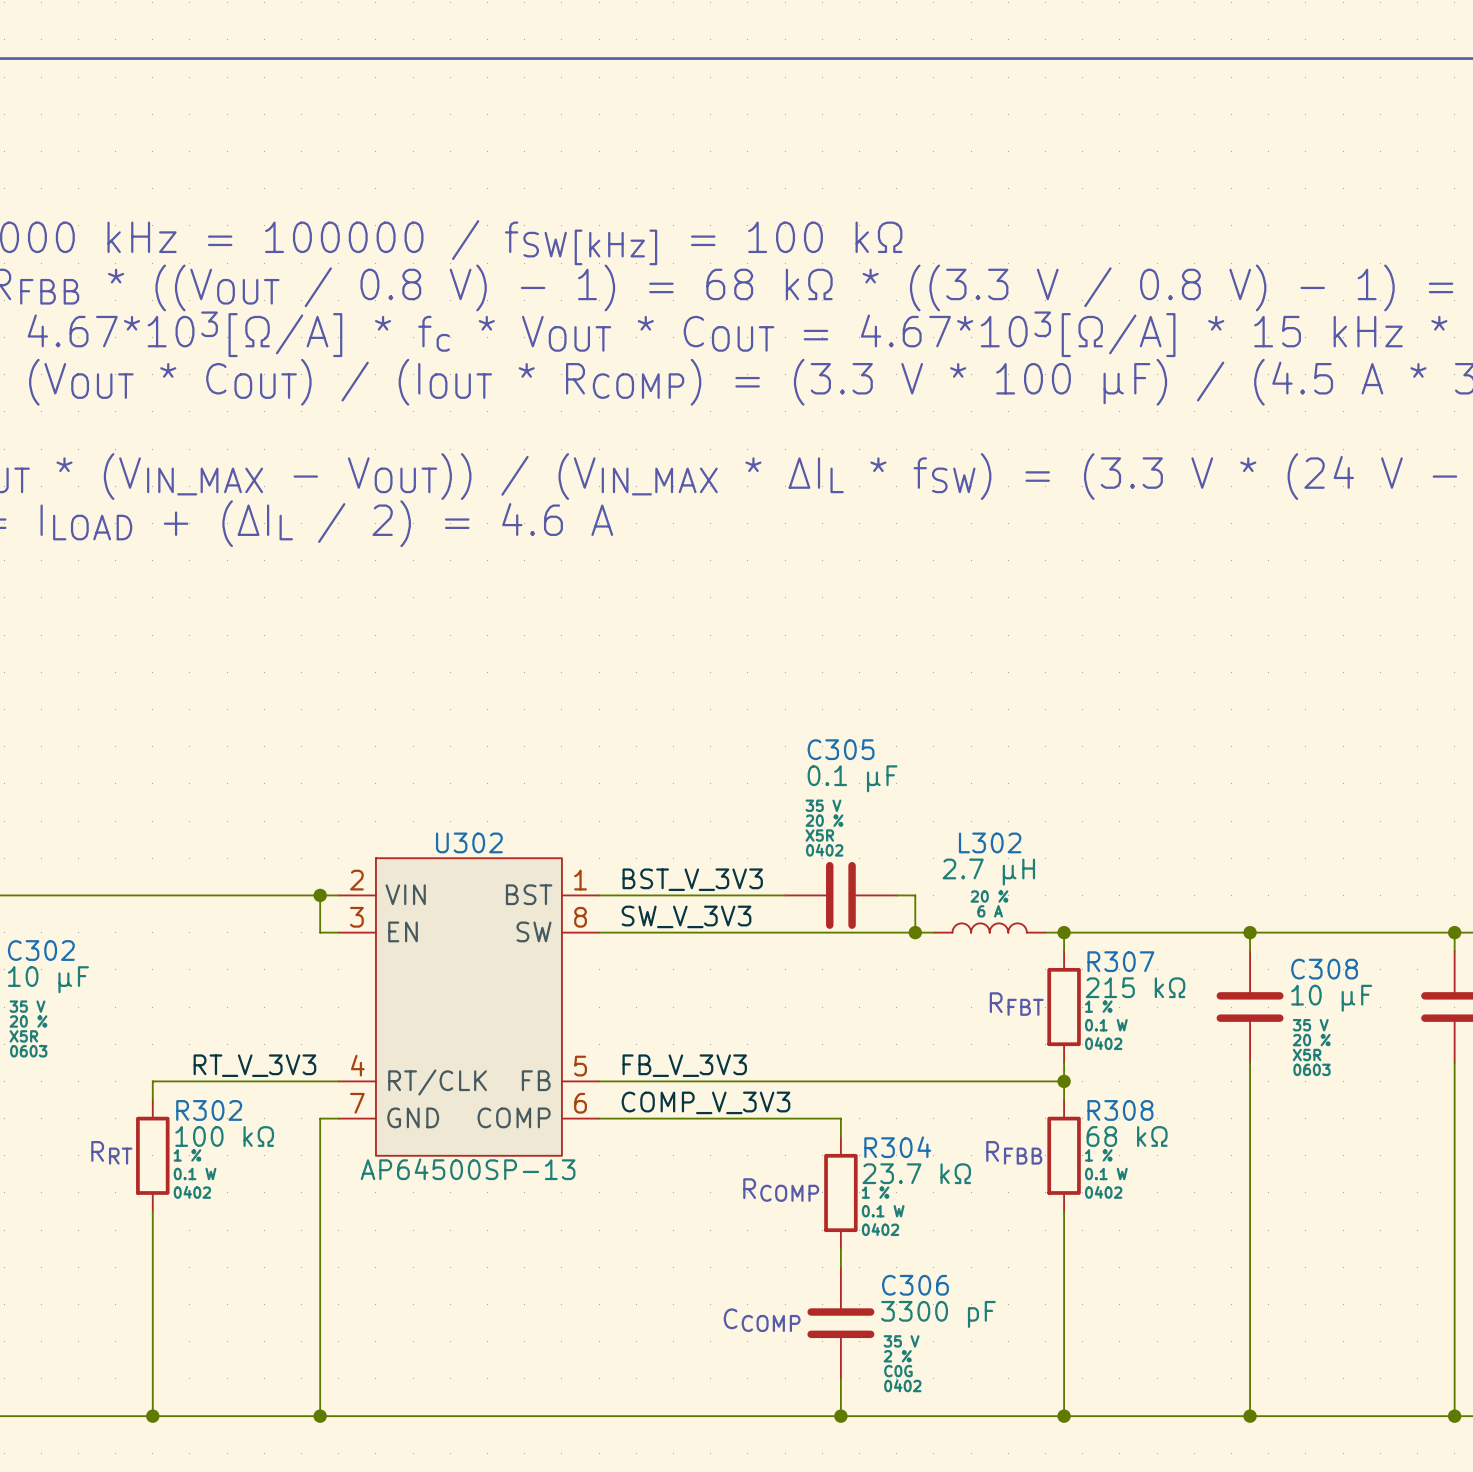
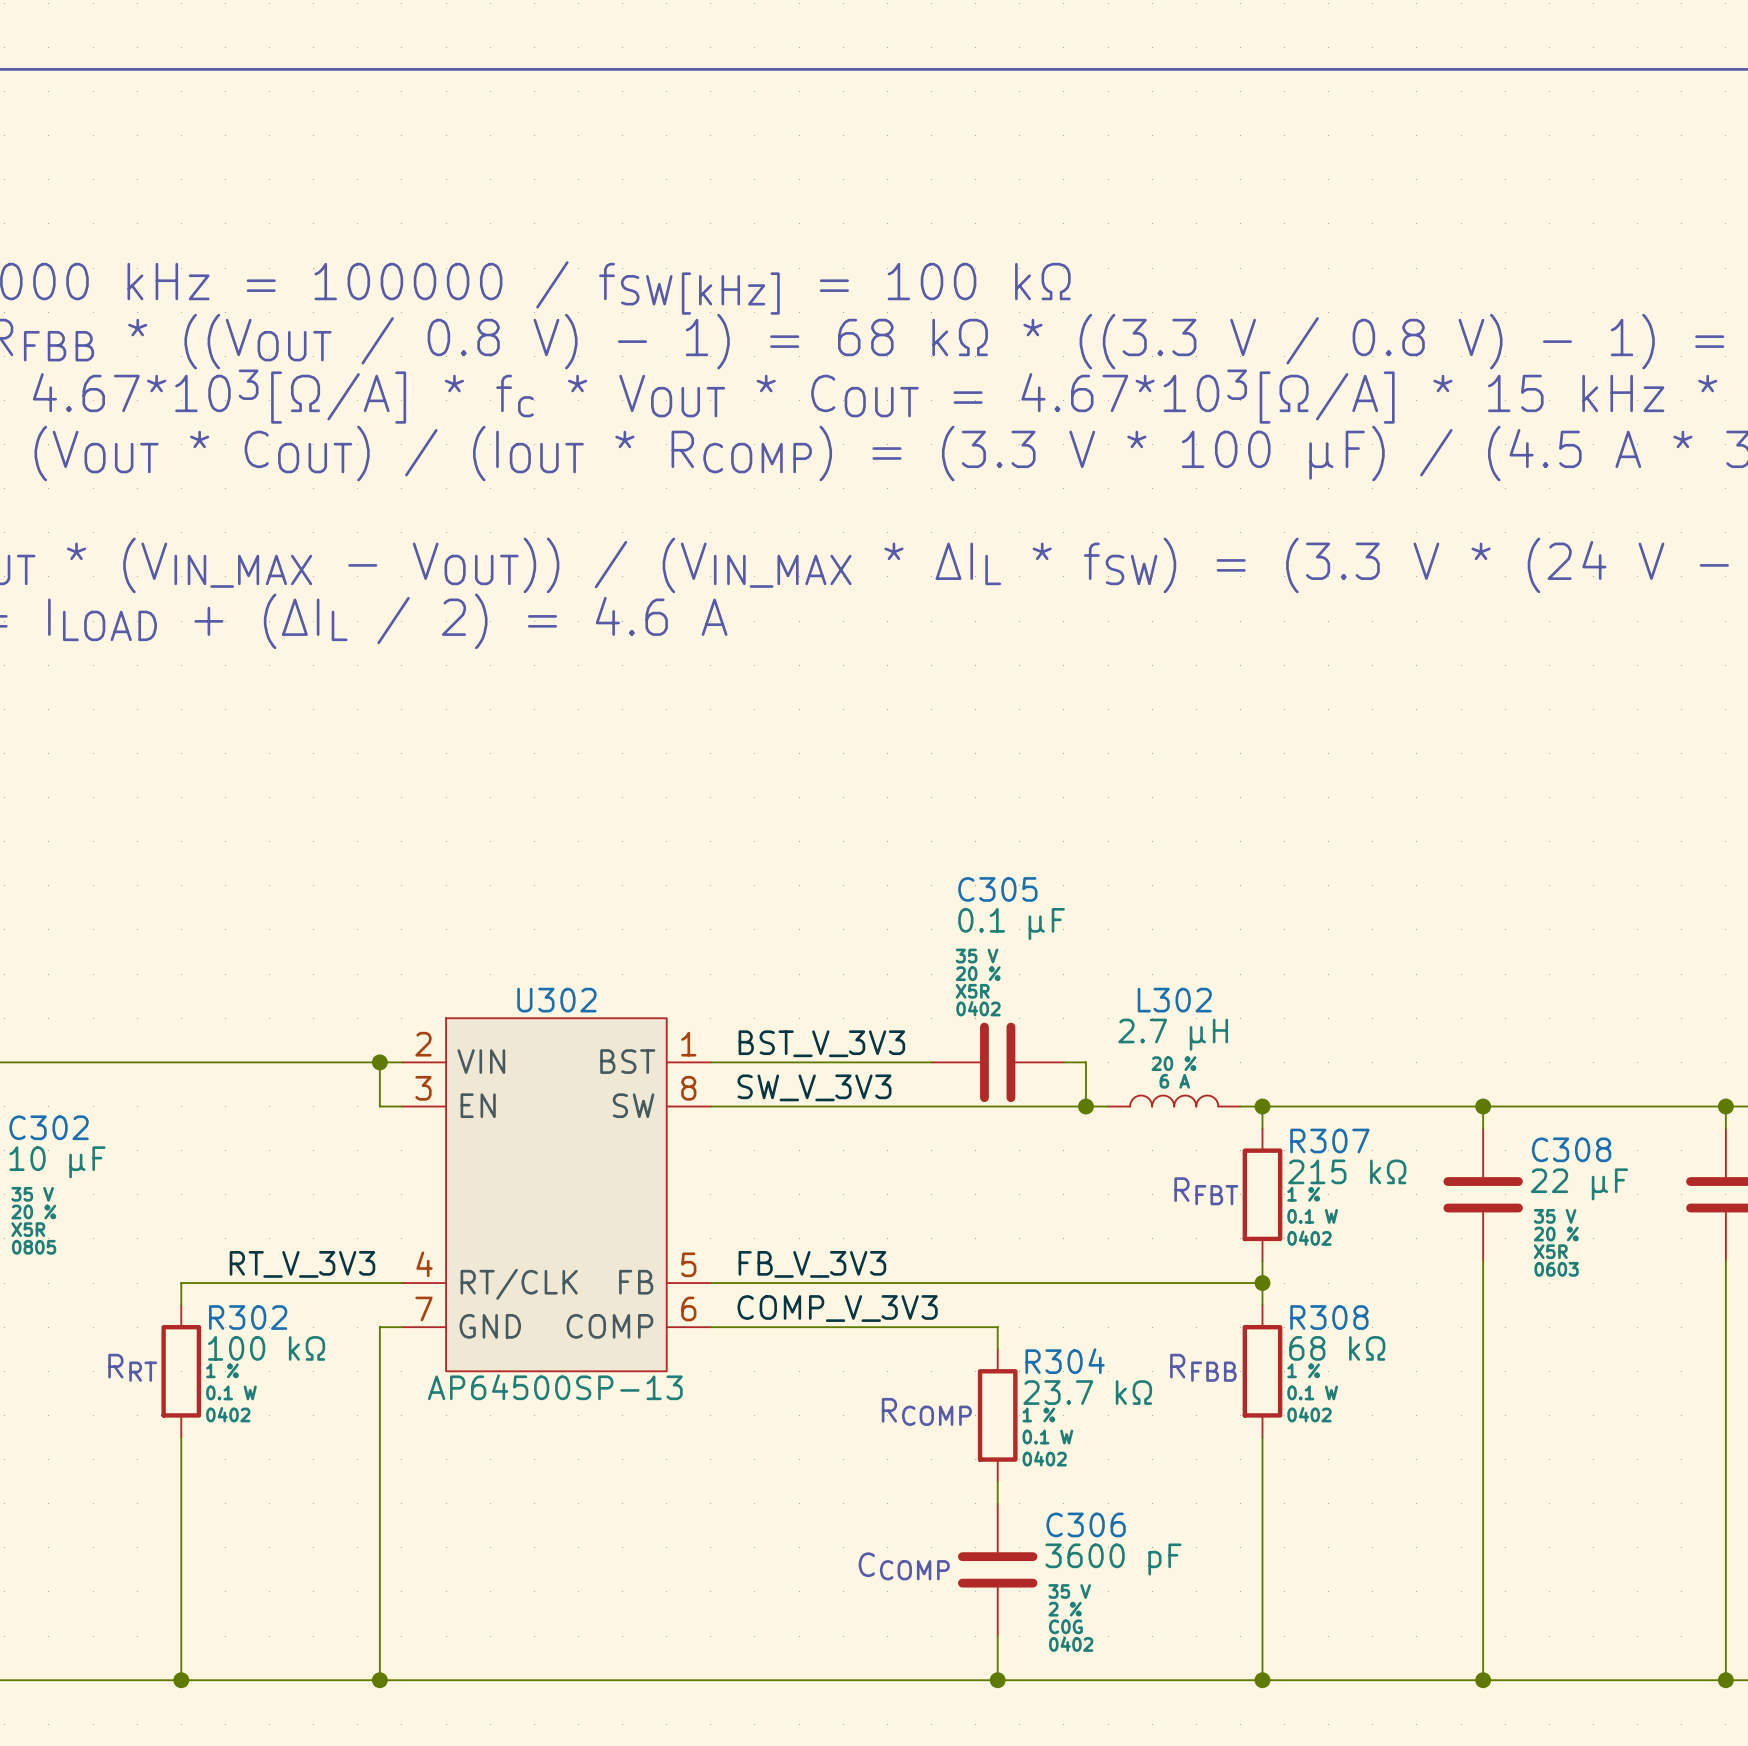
C308 value: 10 µF (1331, 998) -> 22 µF (1579, 1184)
C302 text: 0603 (28, 1051) -> 0805 (34, 1247)
C306 value: 3300 pF (938, 1314) -> 3600 pF (1113, 1559)

